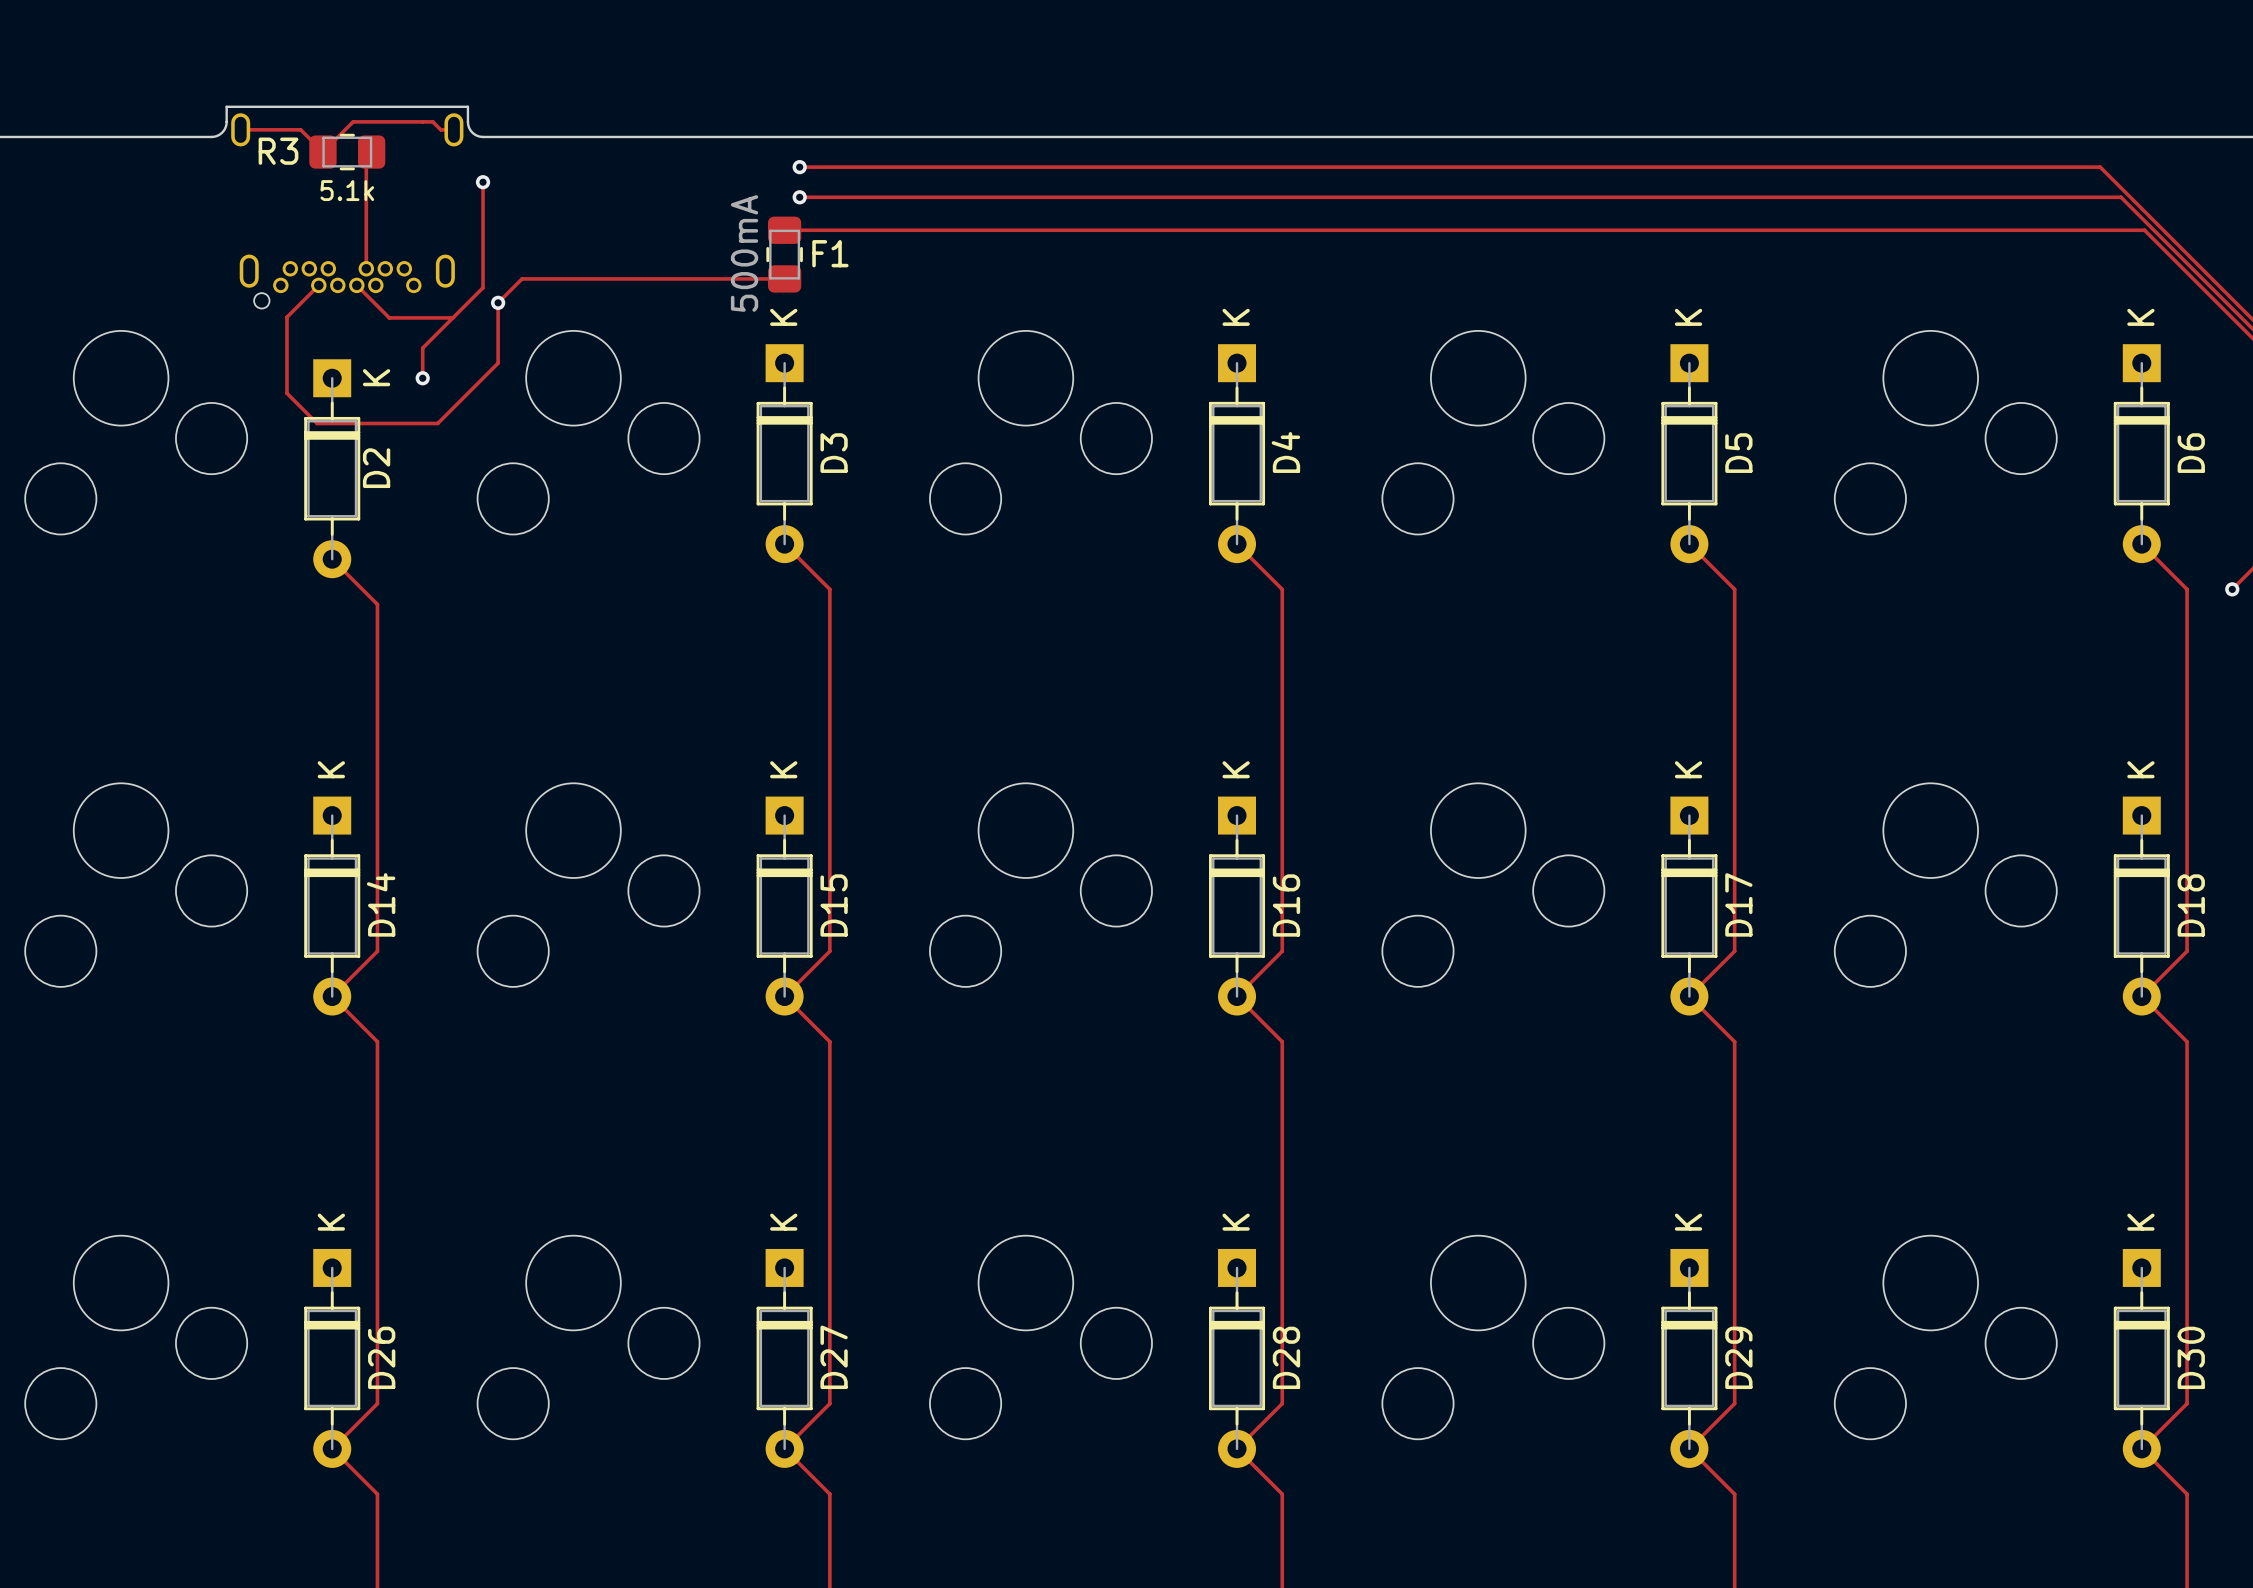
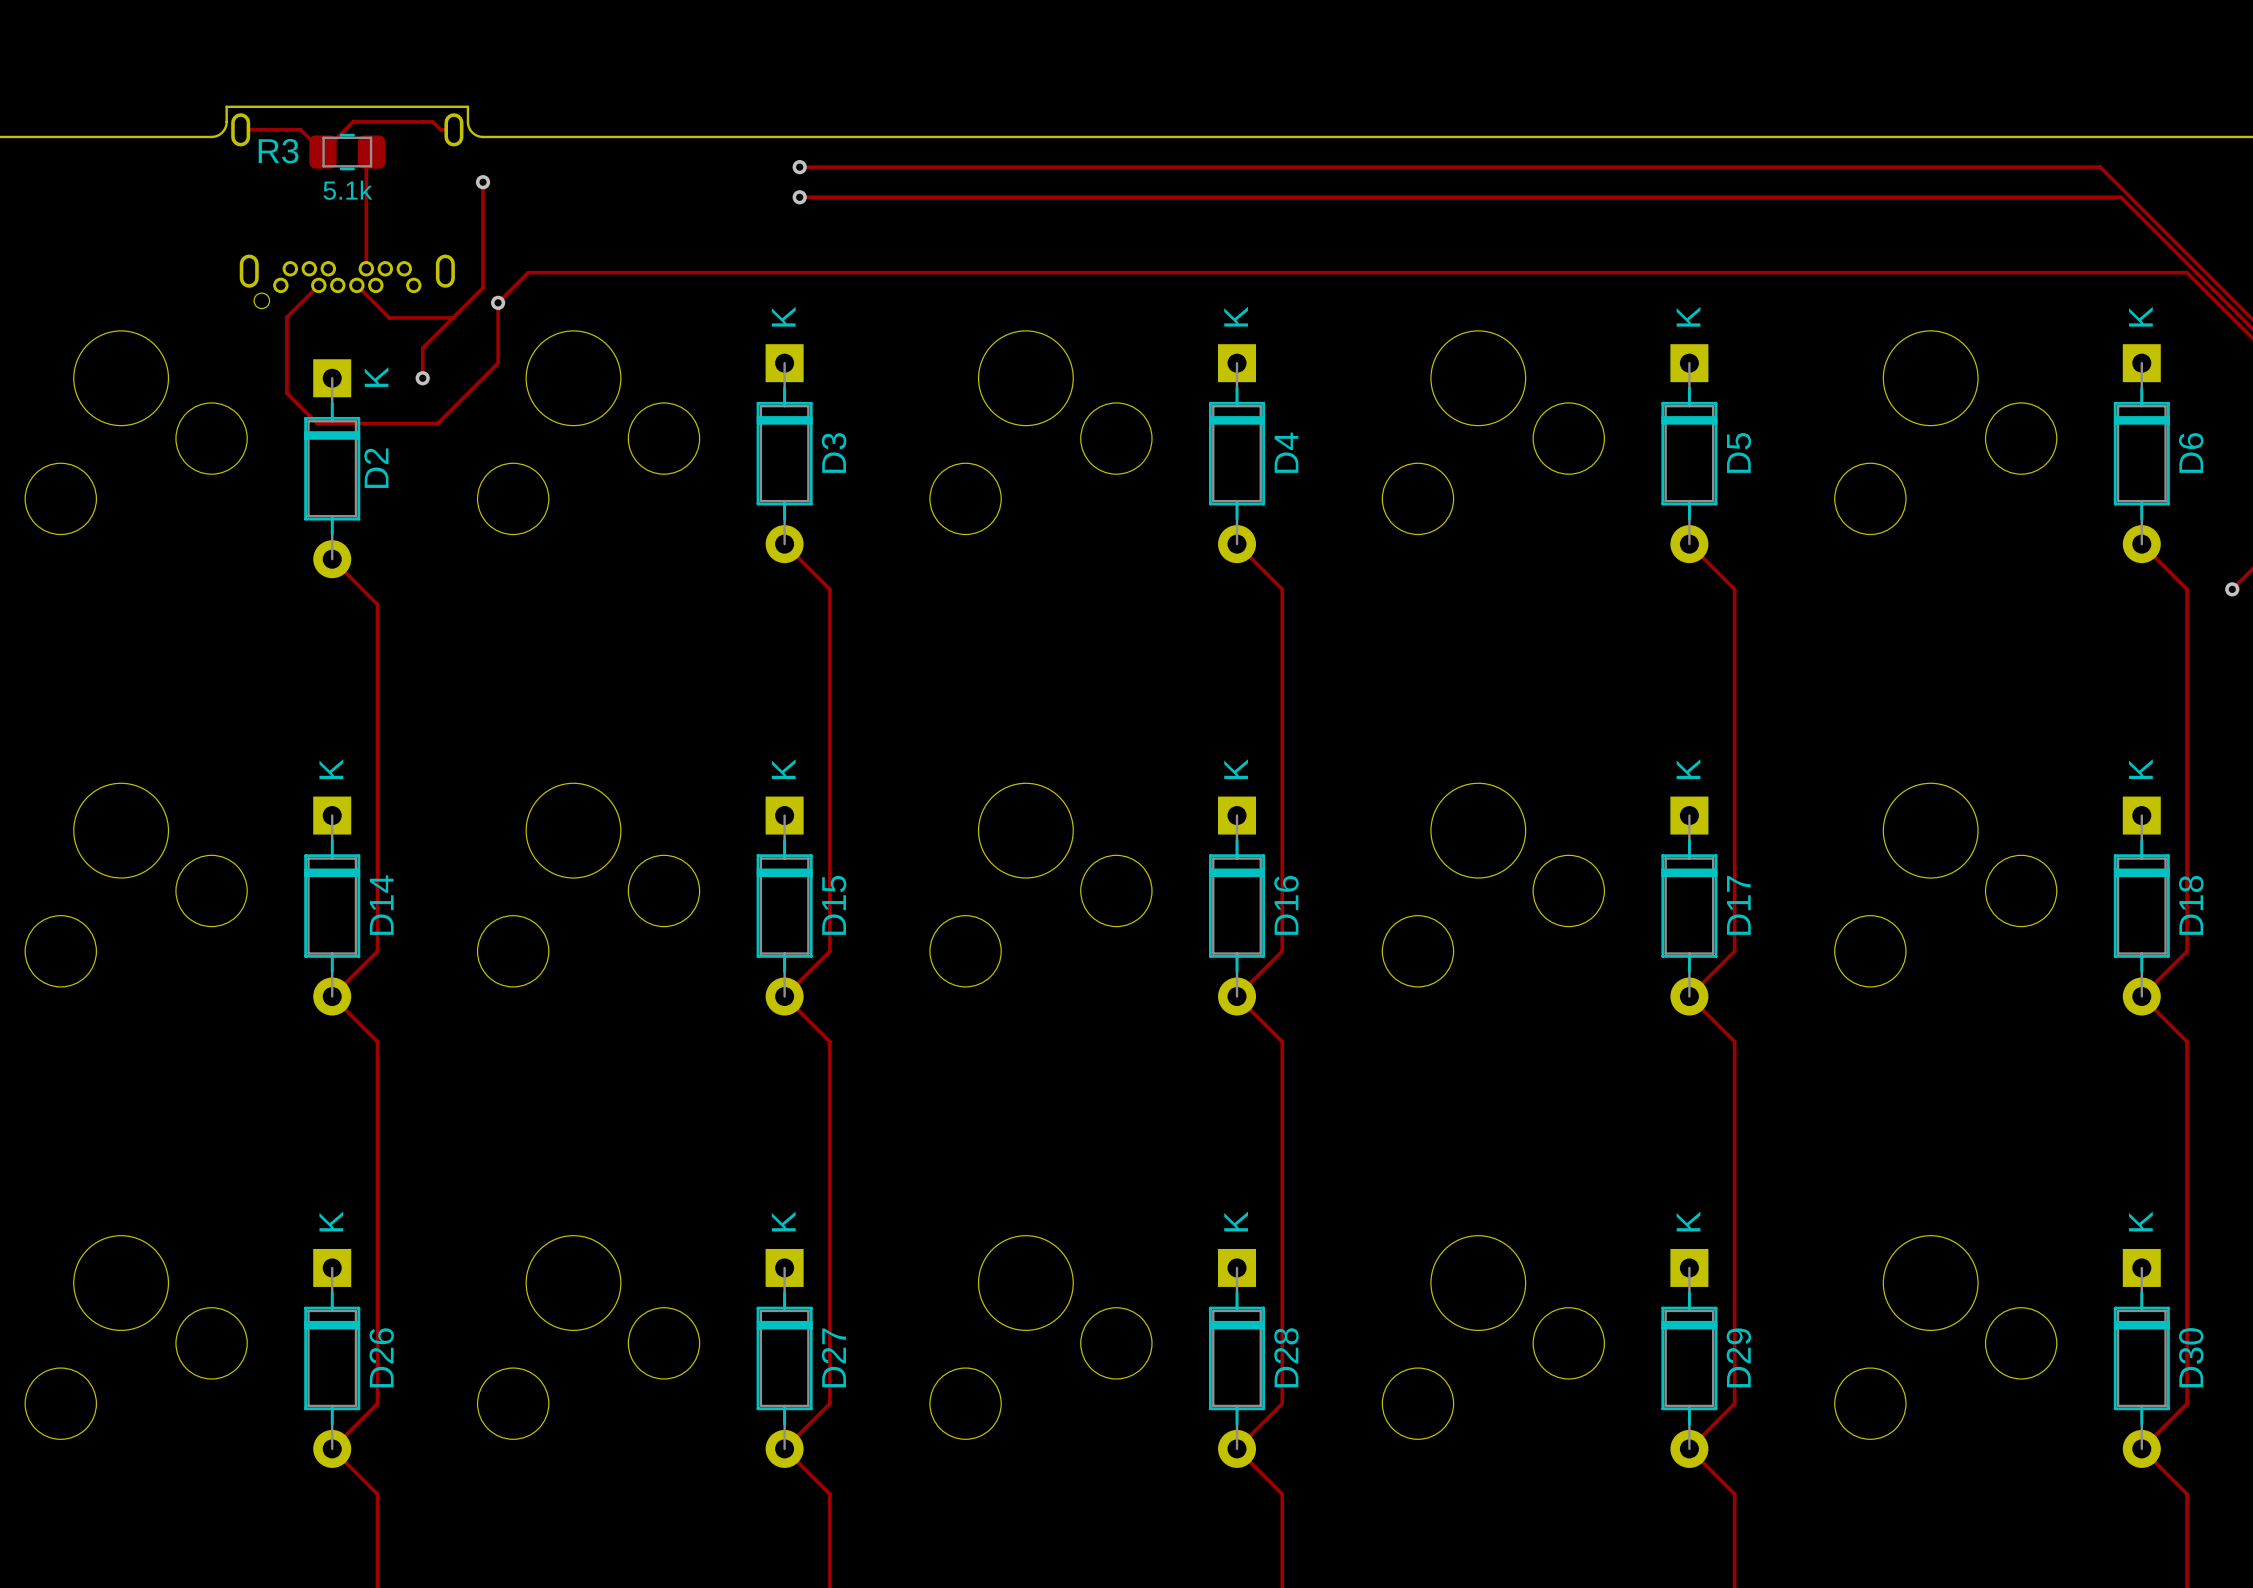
track: (784, 230) (2144, 230) (2187, 272) -> (522, 278) (528, 272) (2187, 272)
F1: 500mA (784, 254) -> none
track: (522, 278) (784, 278) -> none

